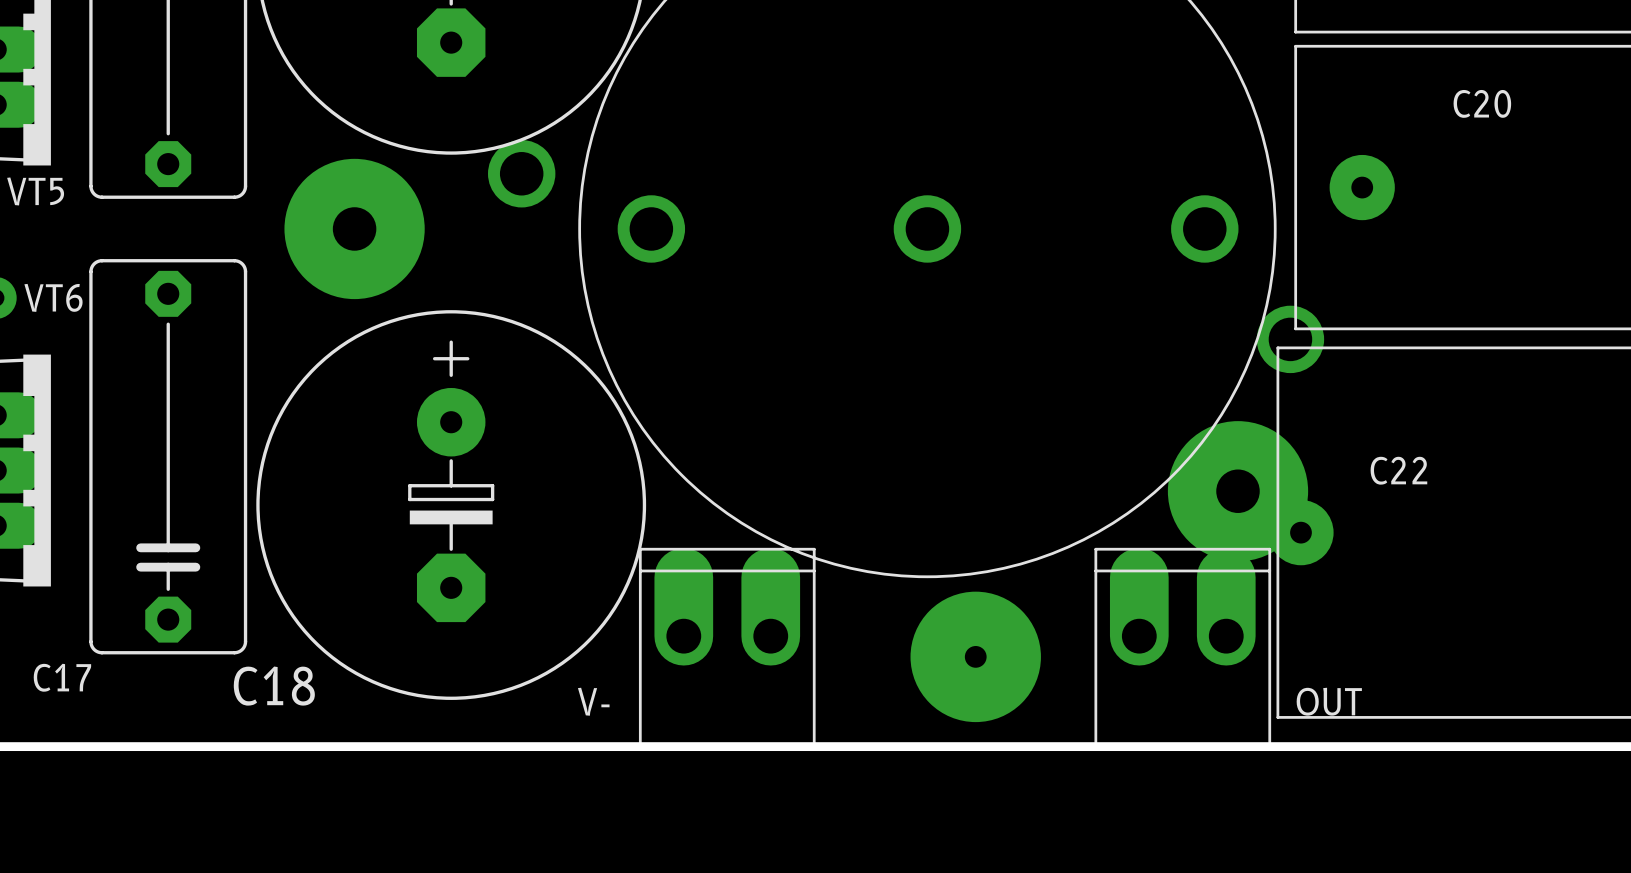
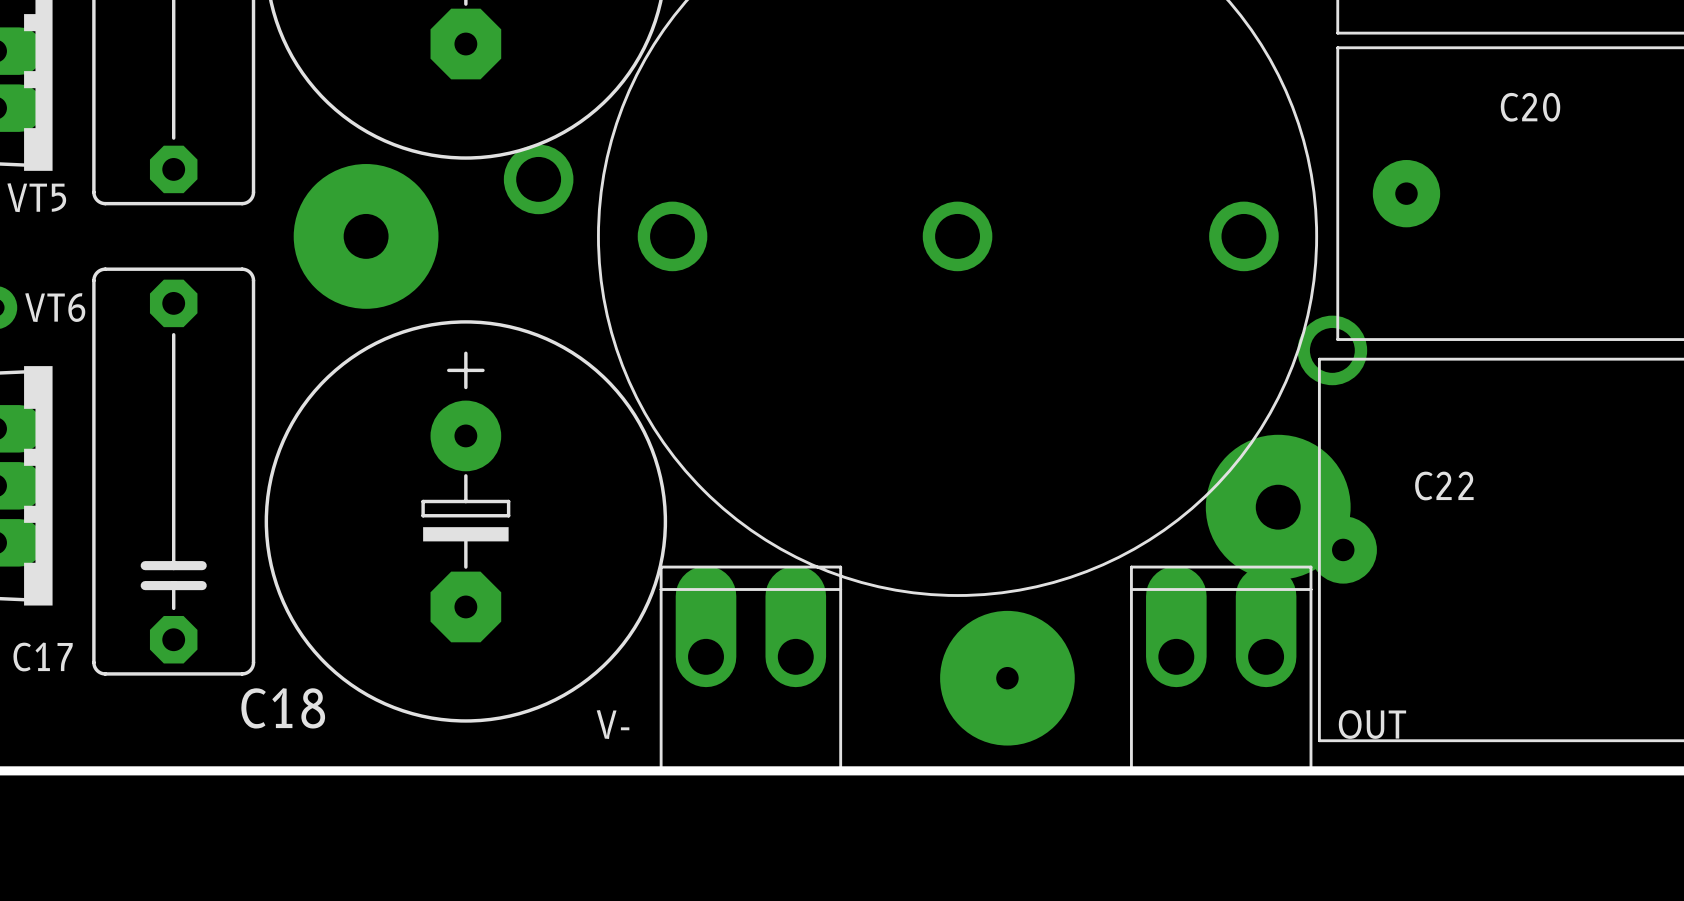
C17 name position: C17 (62, 677) -> C17 (43, 656)

